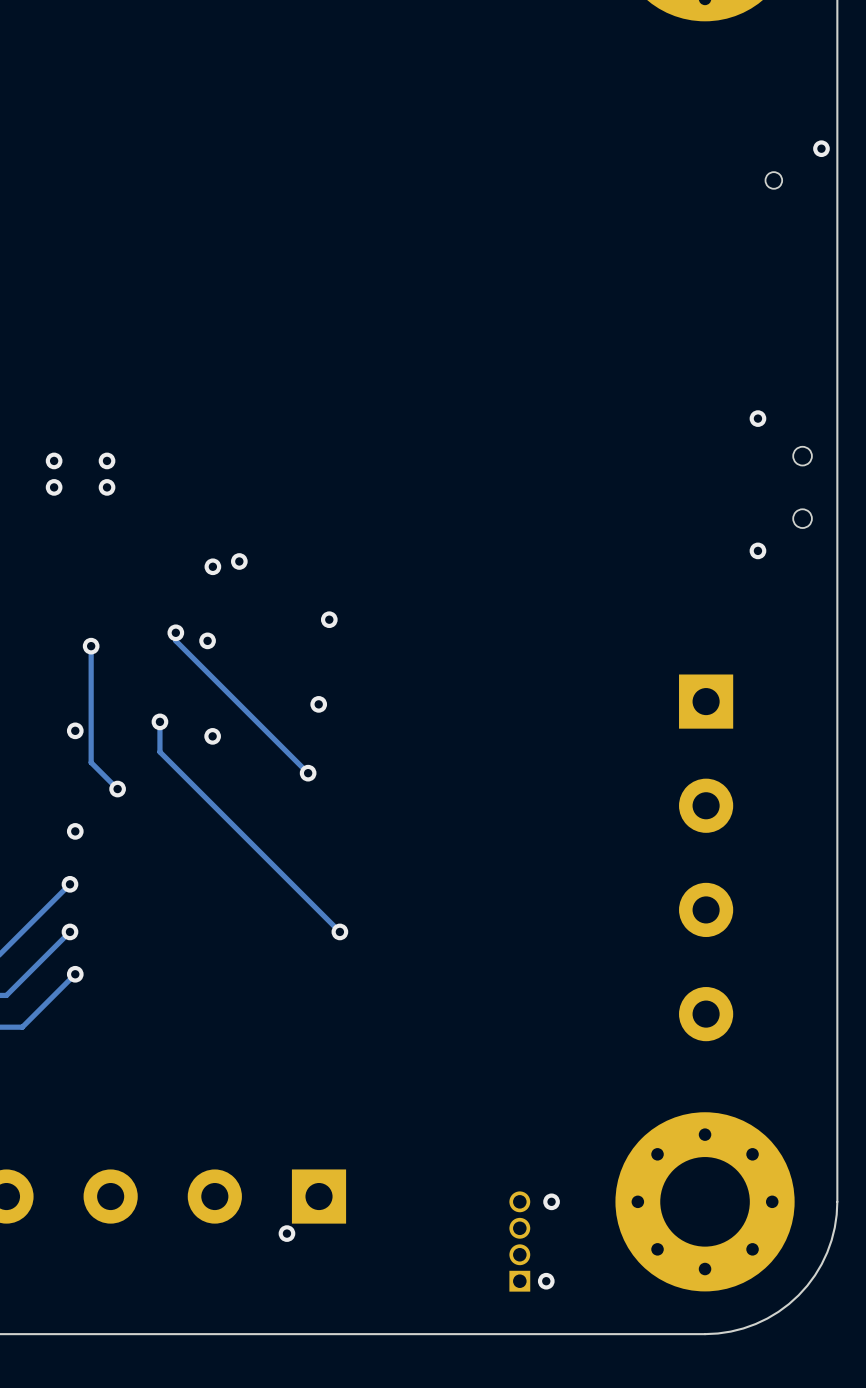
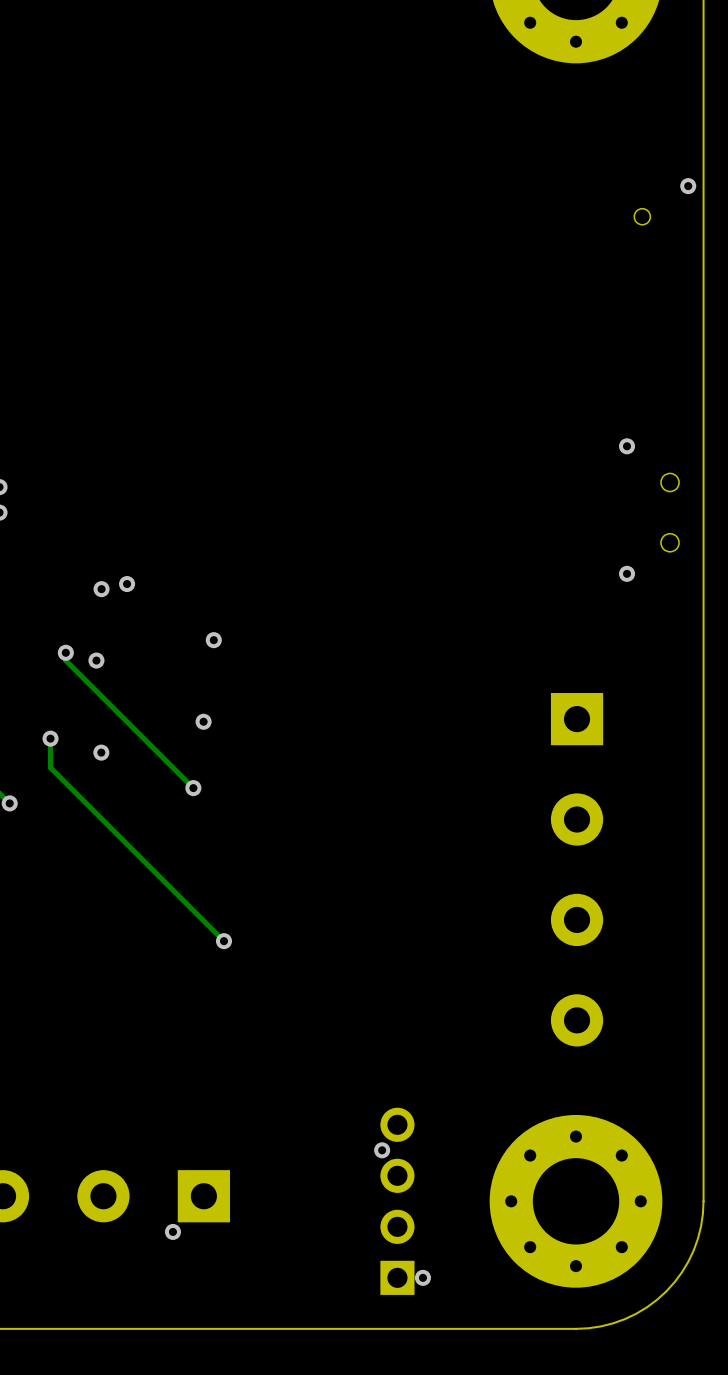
part: none -> (397, 1201)
via position: (551, 1201) -> (382, 1150)
part: (519, 1241) -> none

